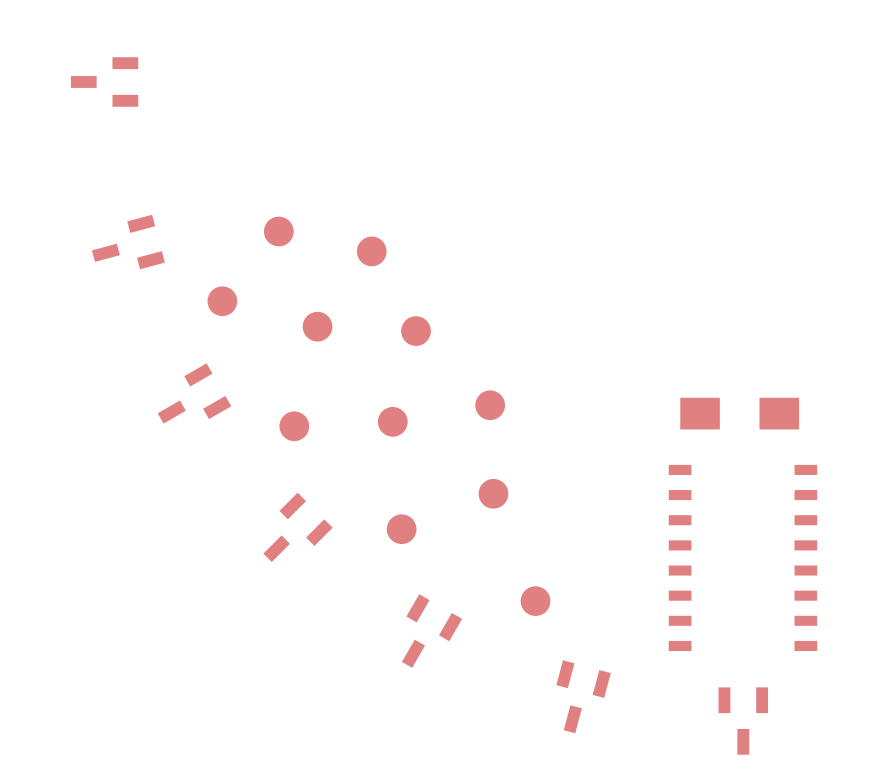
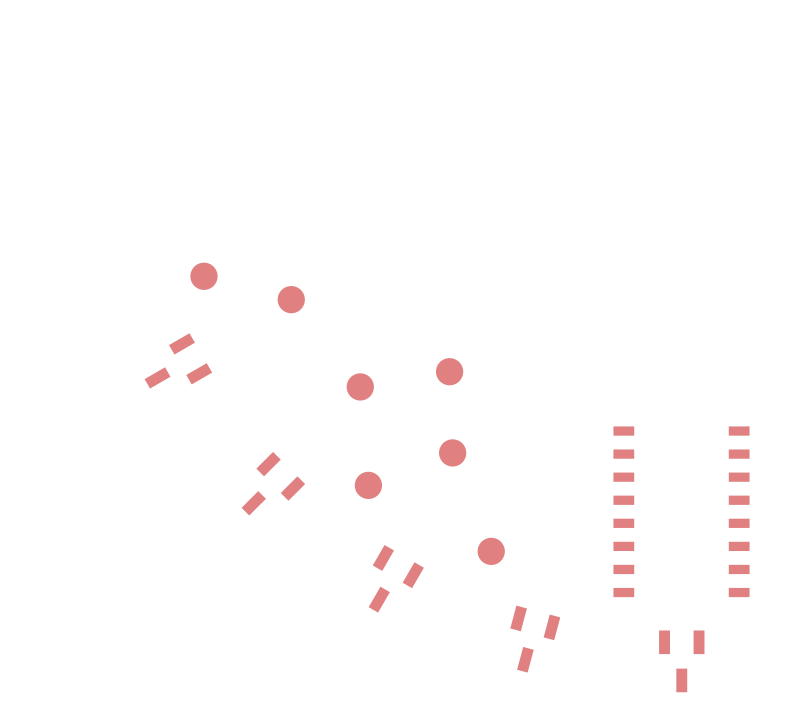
part: (104, 82) -> none
part: (278, 231) -> none
part: (128, 242) -> none
part: (371, 251) -> none
part: (416, 331) -> none
part: (739, 413) -> none
part: (294, 426) -> none

